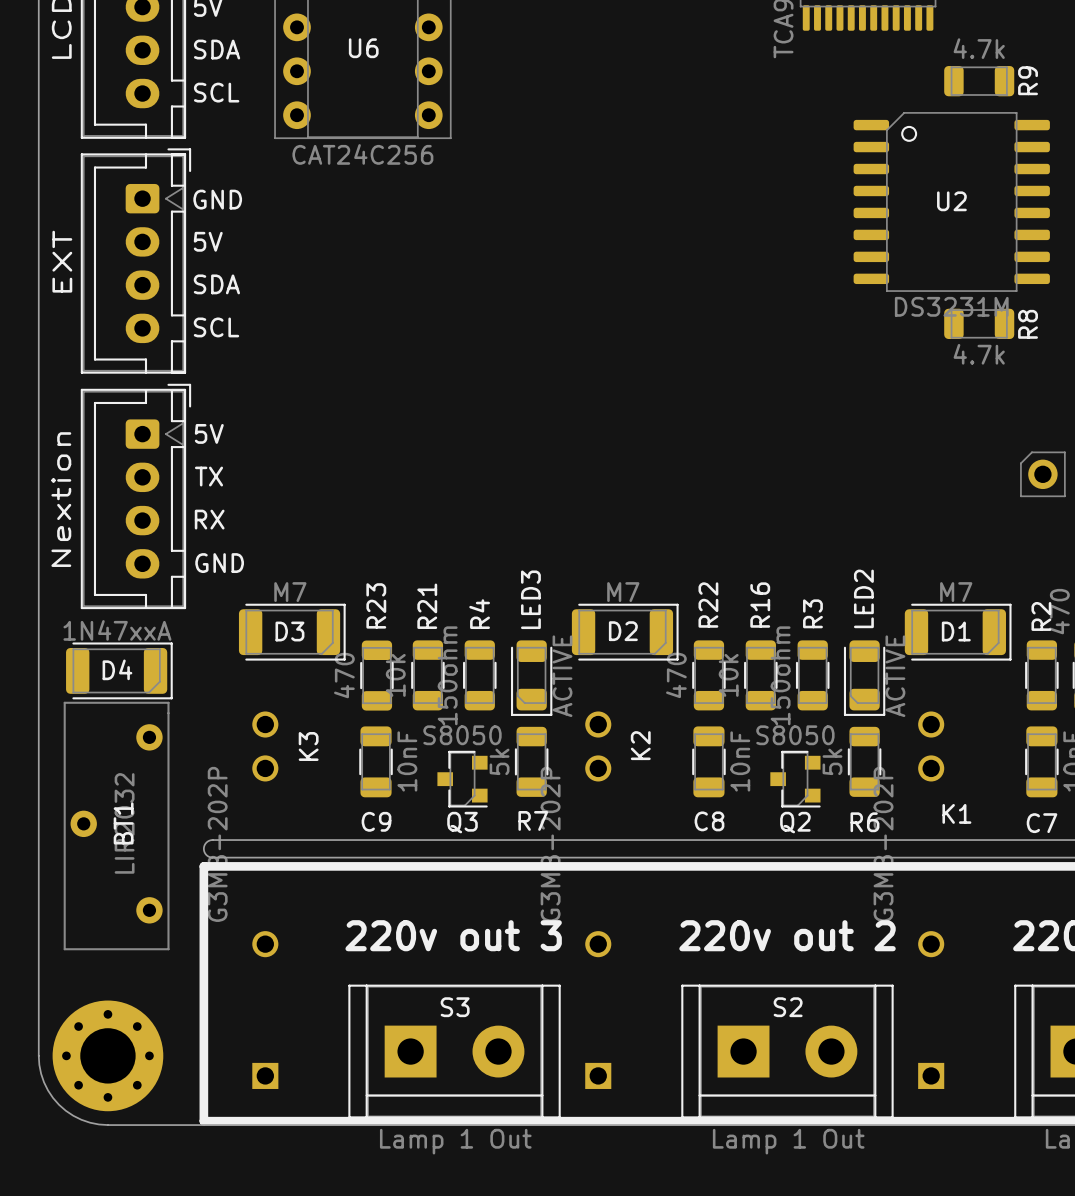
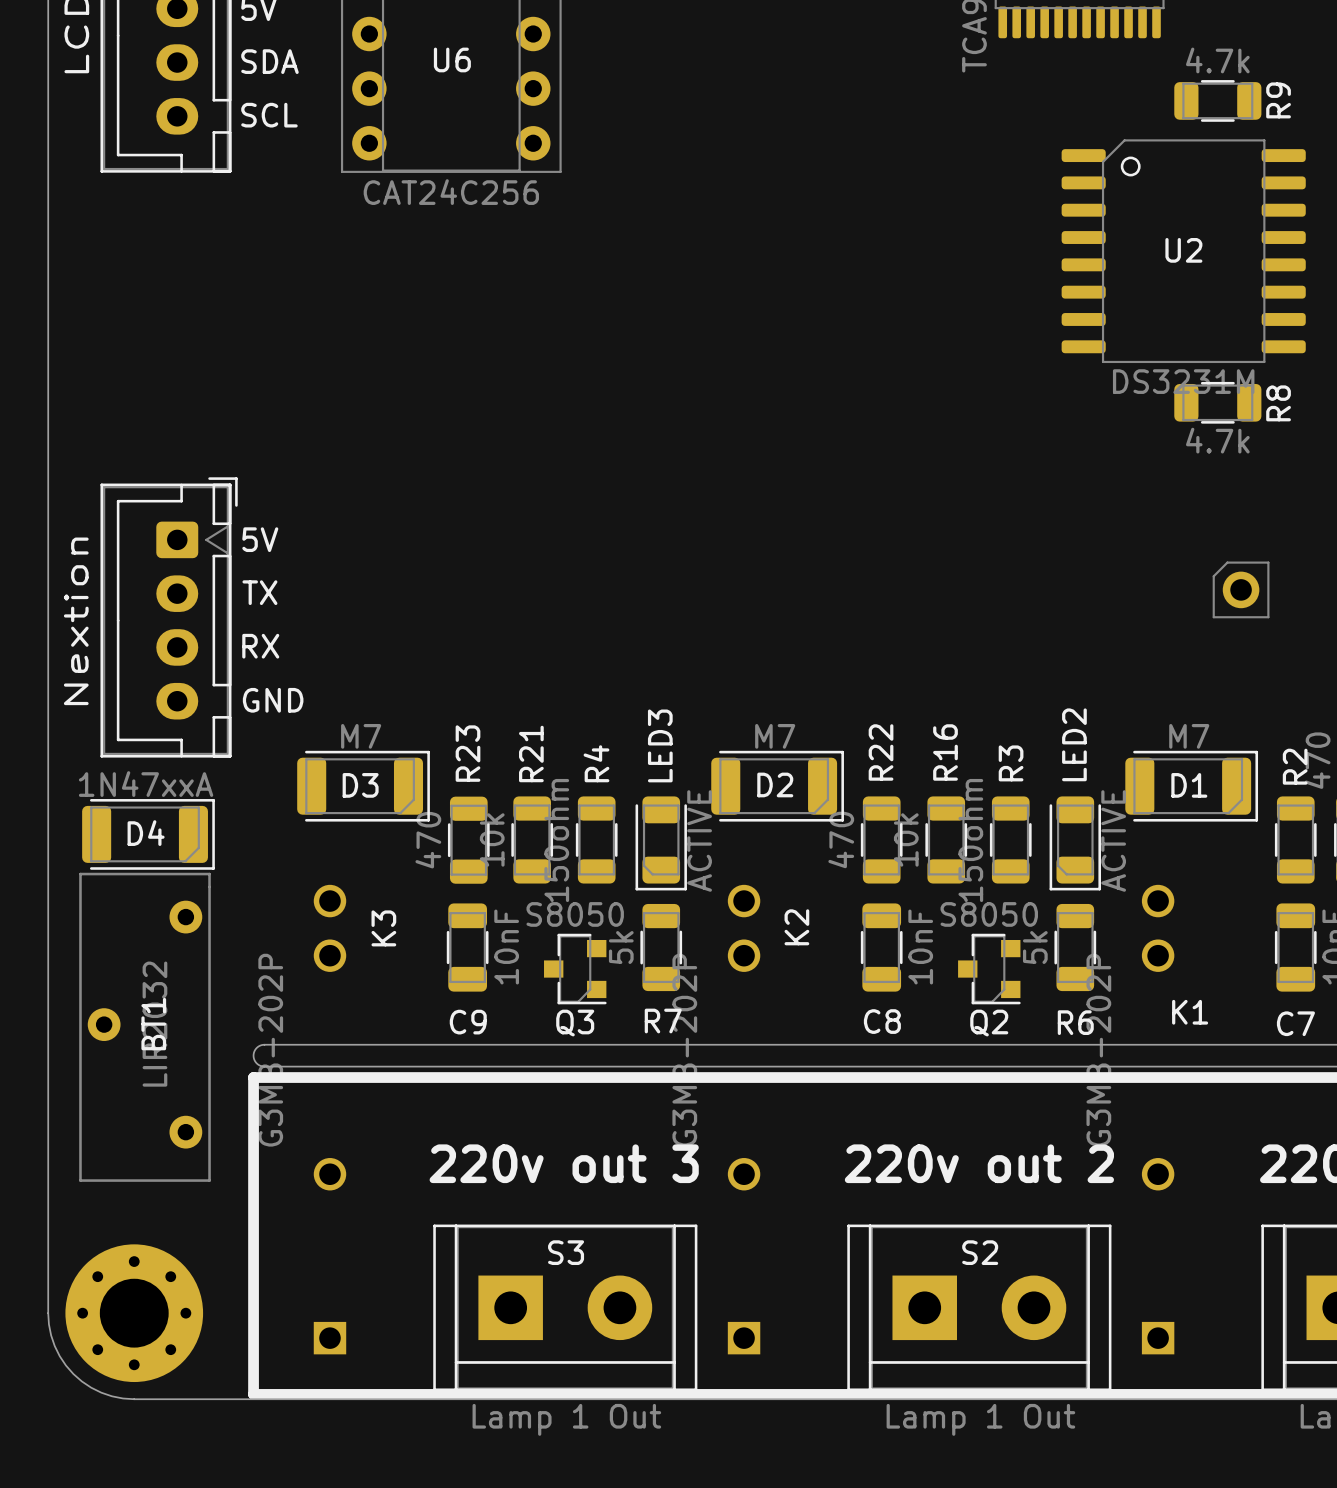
R9 footprint: [944, 66, 1015, 97] -> [1174, 80, 1262, 122]
text: GND (217, 199) -> none
text: 5V (208, 241) -> none
part: EXT (135, 261) -> none
text: SDA (216, 284) -> none
R8 footprint: [944, 308, 1015, 340] -> [1174, 381, 1262, 424]
text: SCL (216, 327) -> none
part position: (1042, 474) -> (1241, 589)

